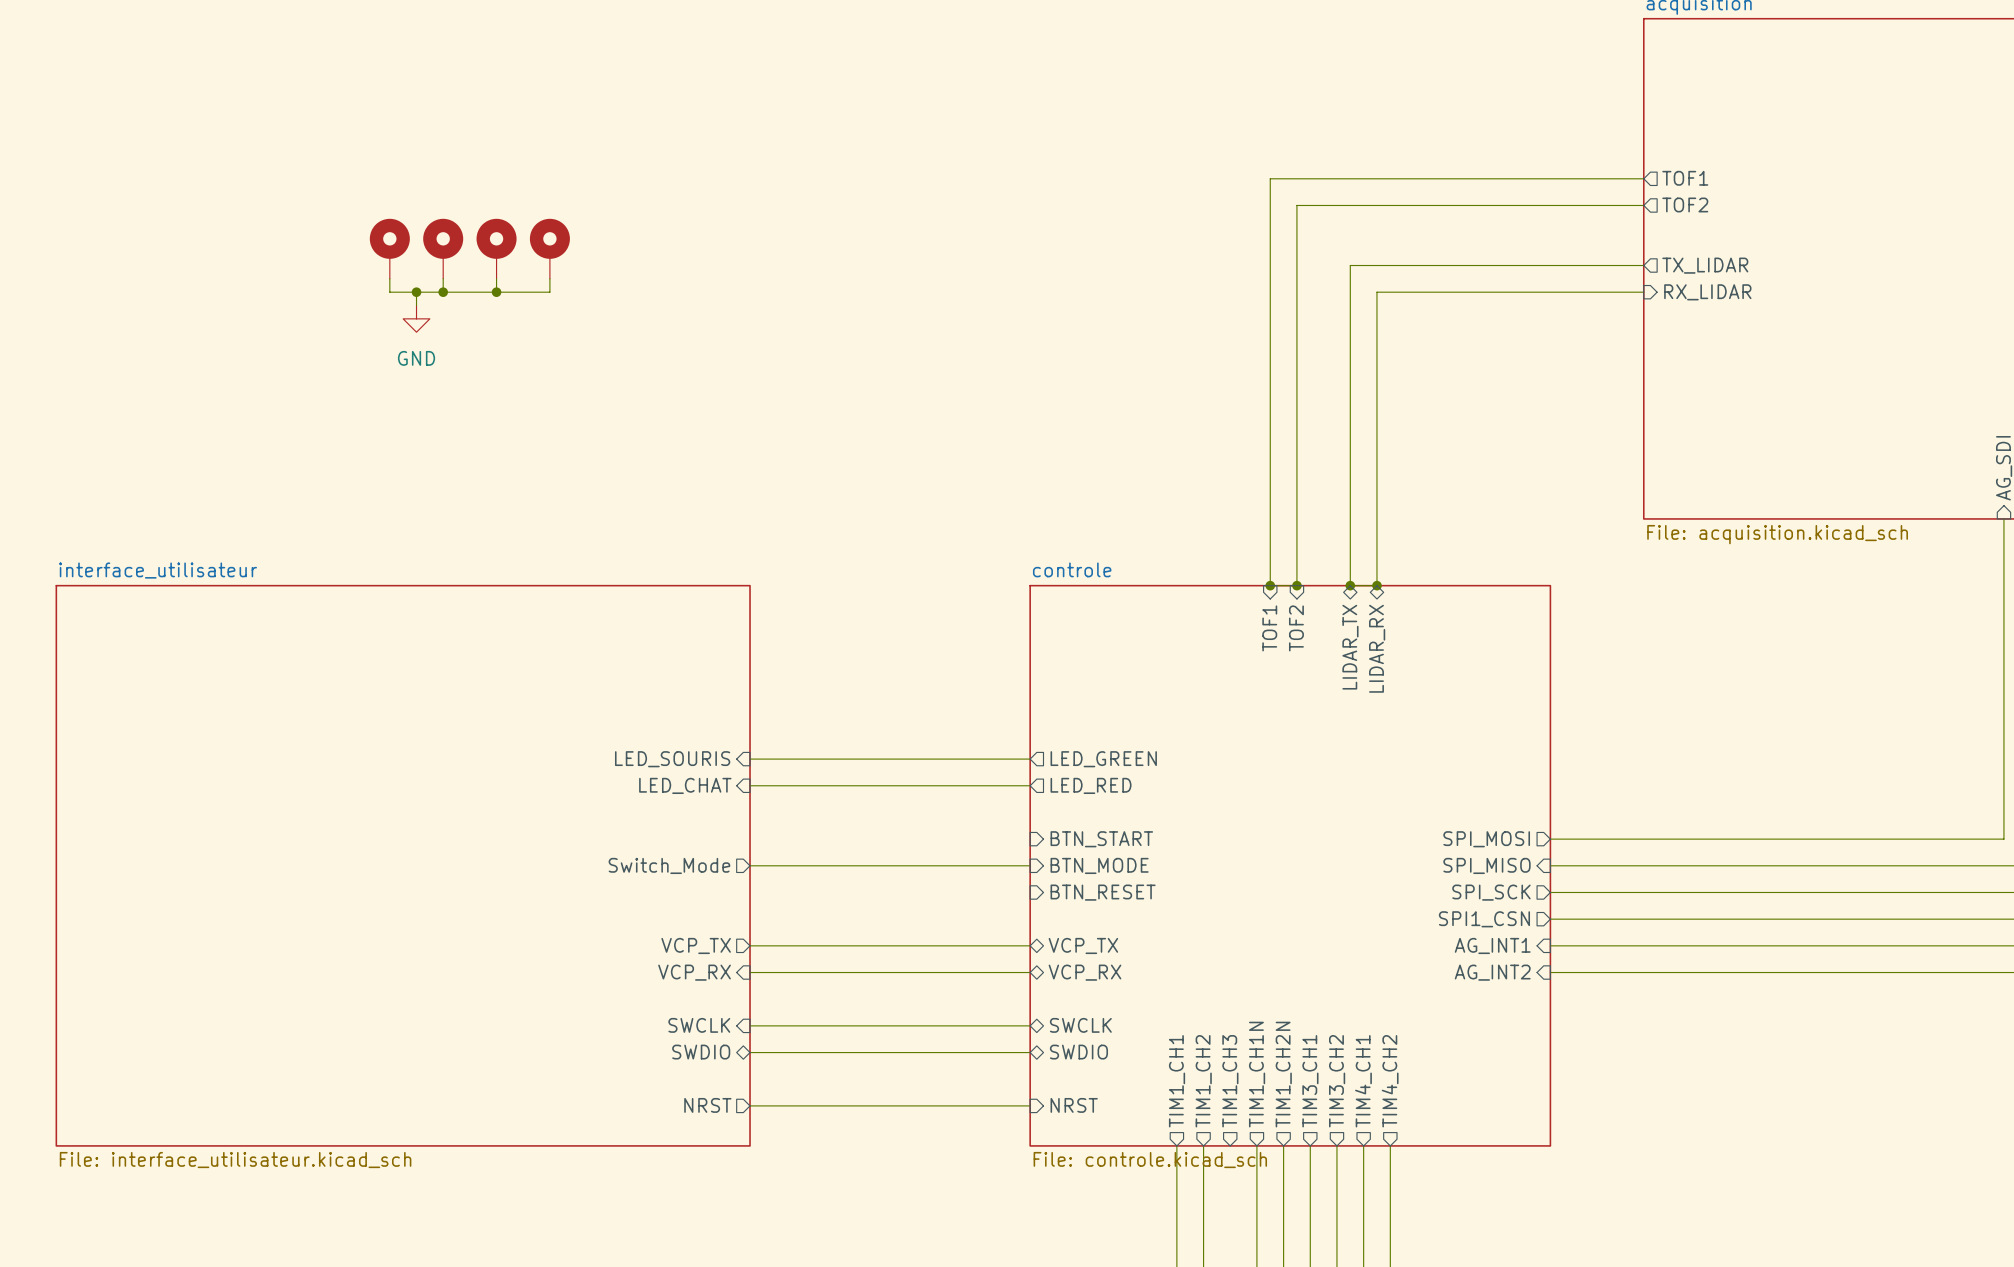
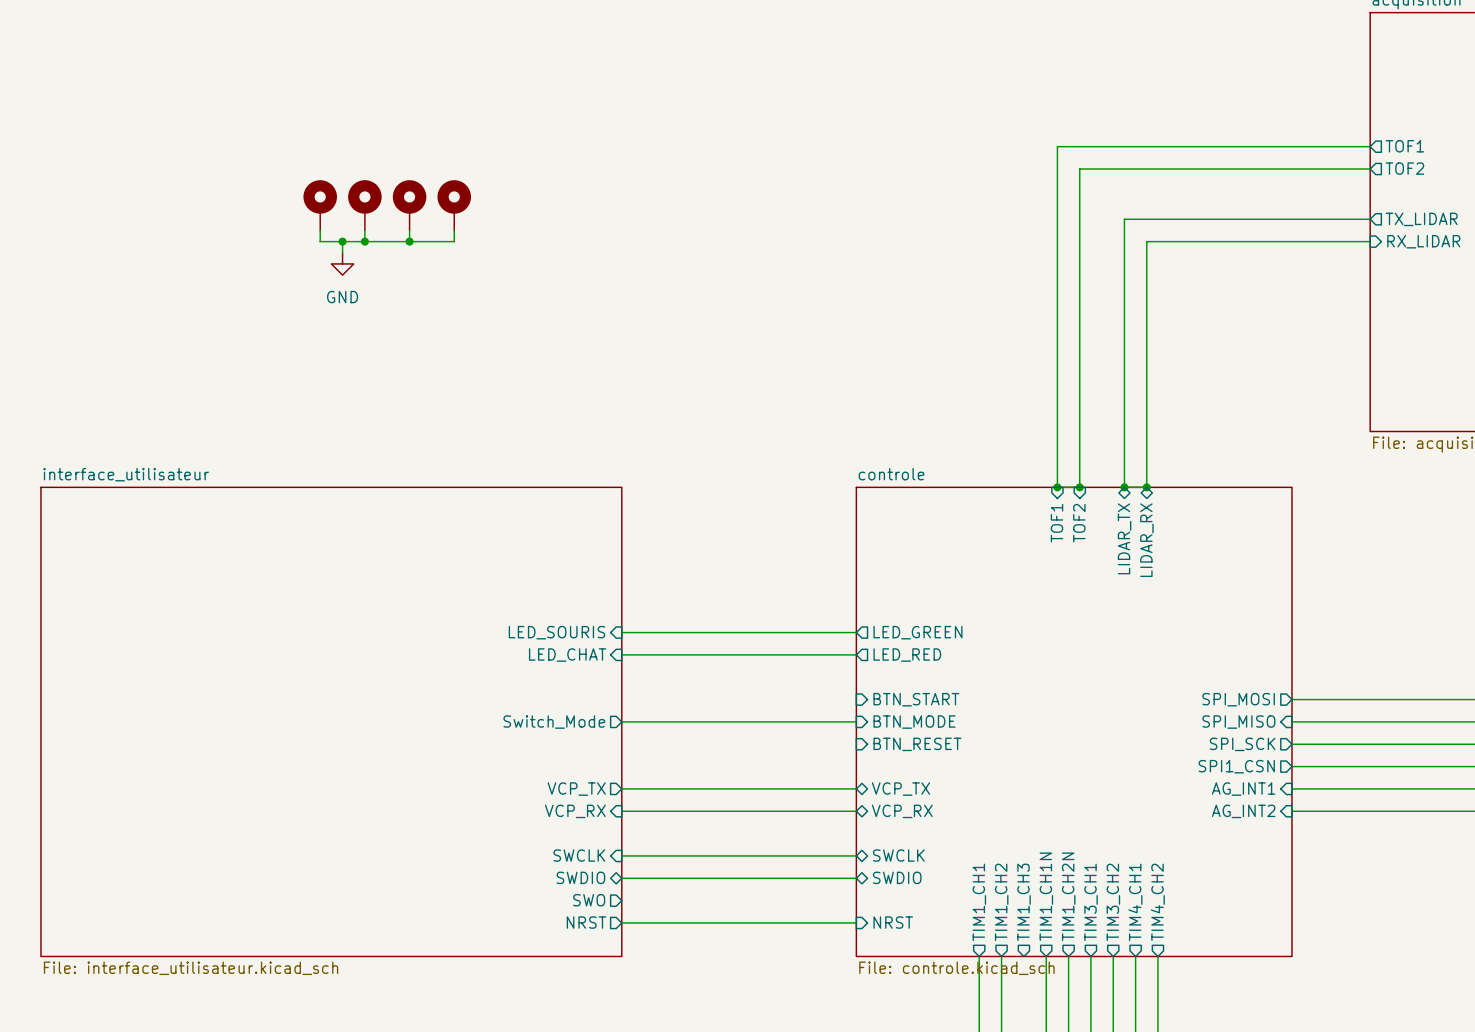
sheet pin: none -> SWO (589, 900)

